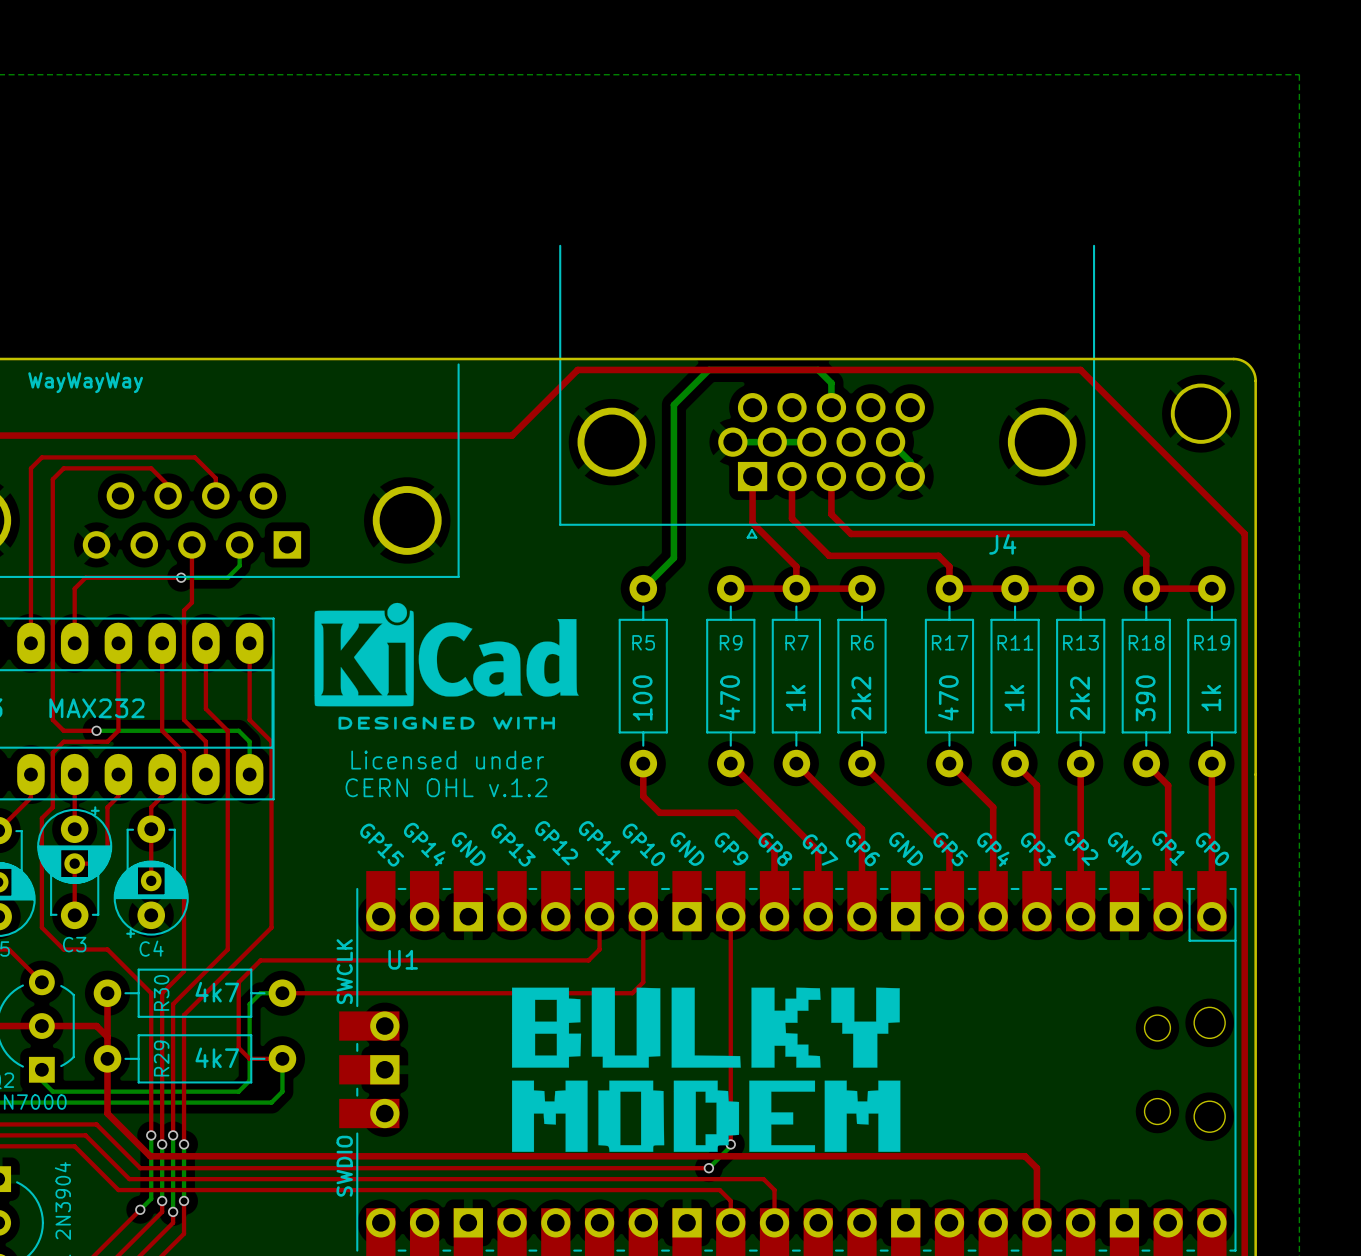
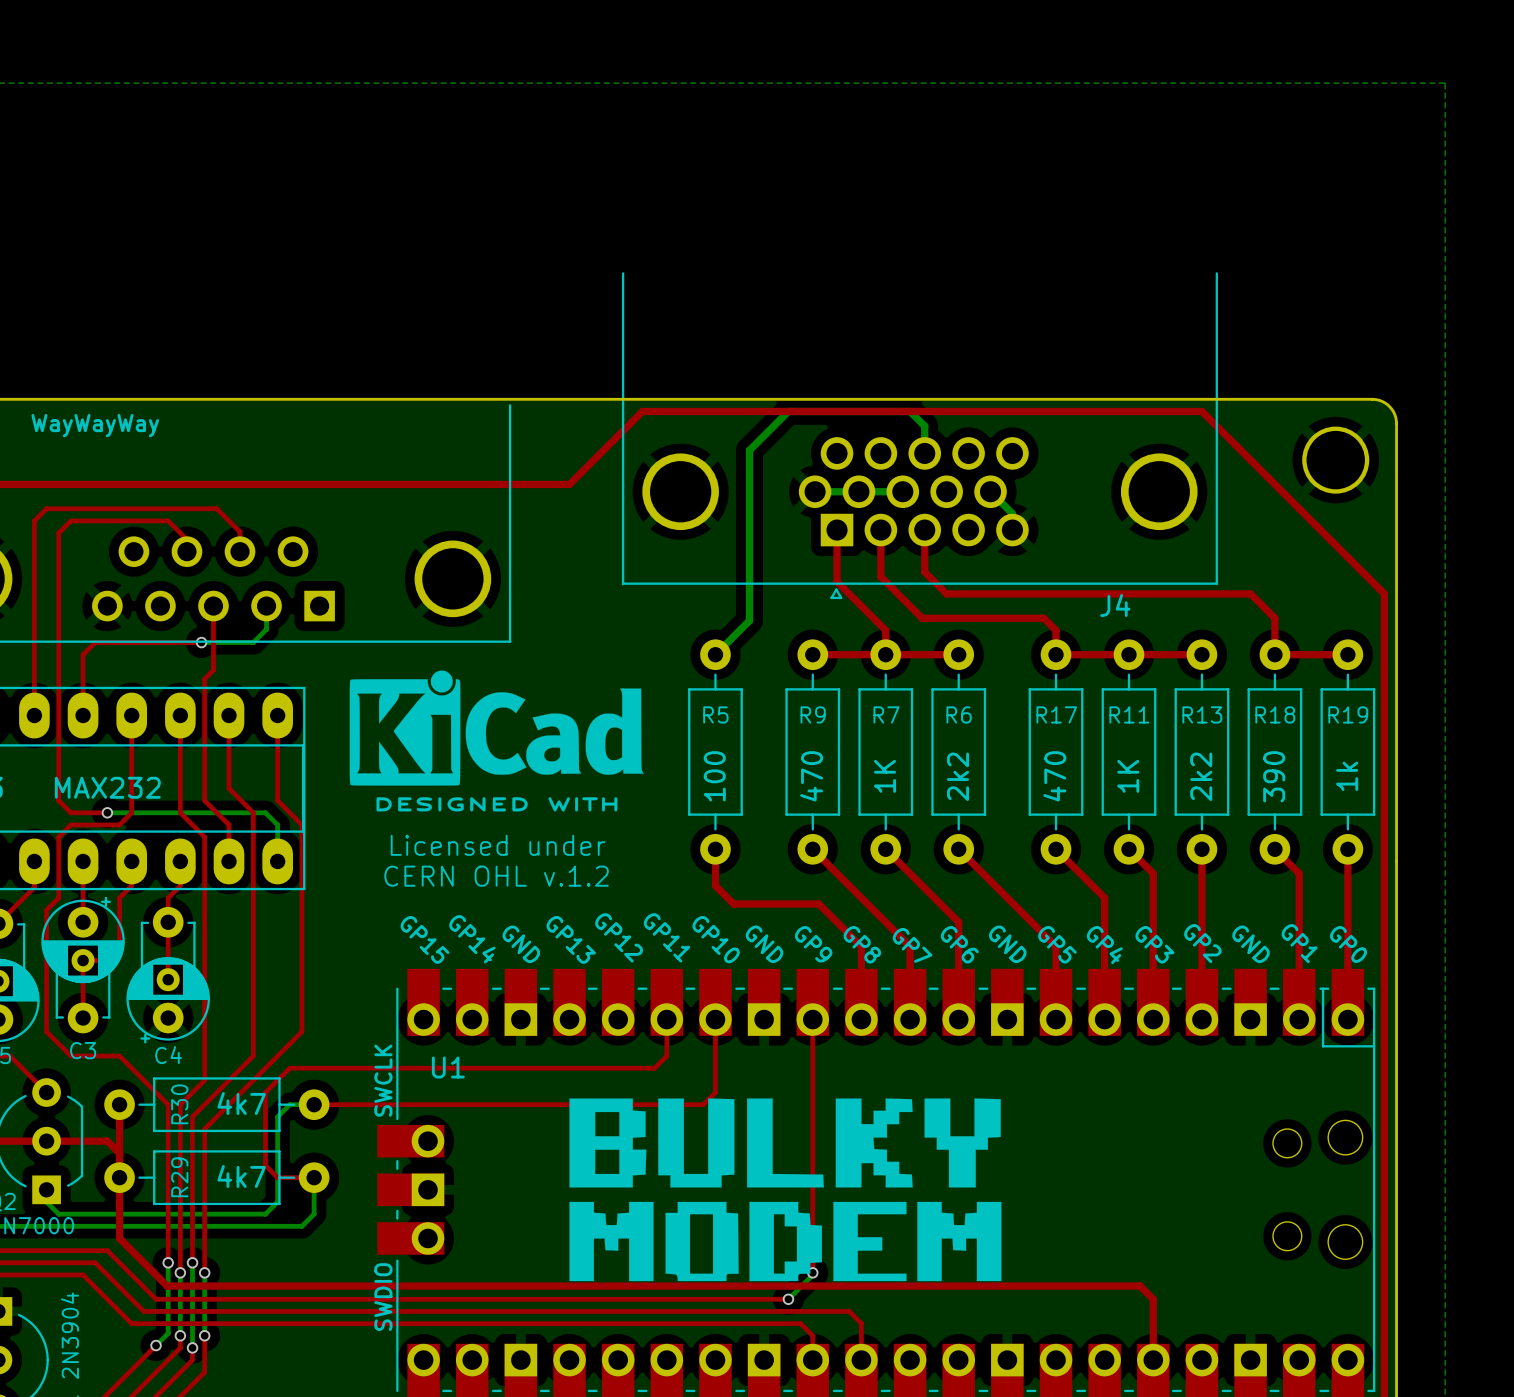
R7 value: 1k (795, 698) -> 1K (885, 776)
R11 value: 1k (1014, 698) -> 1K (1128, 776)

